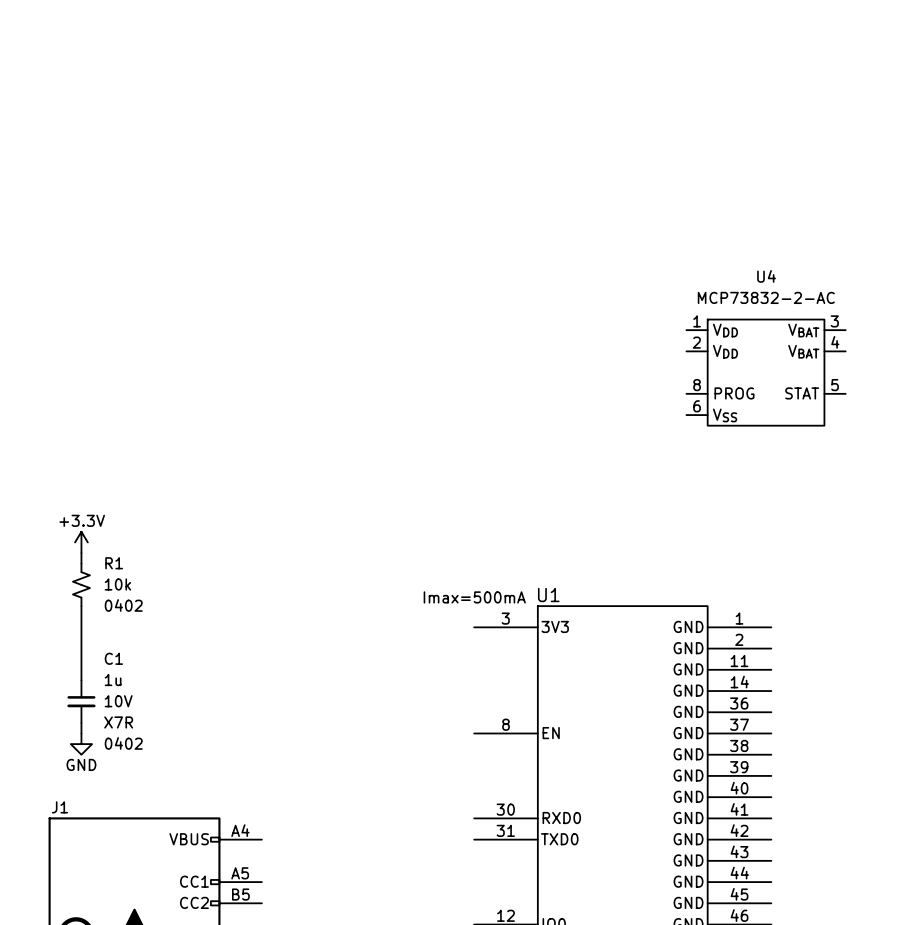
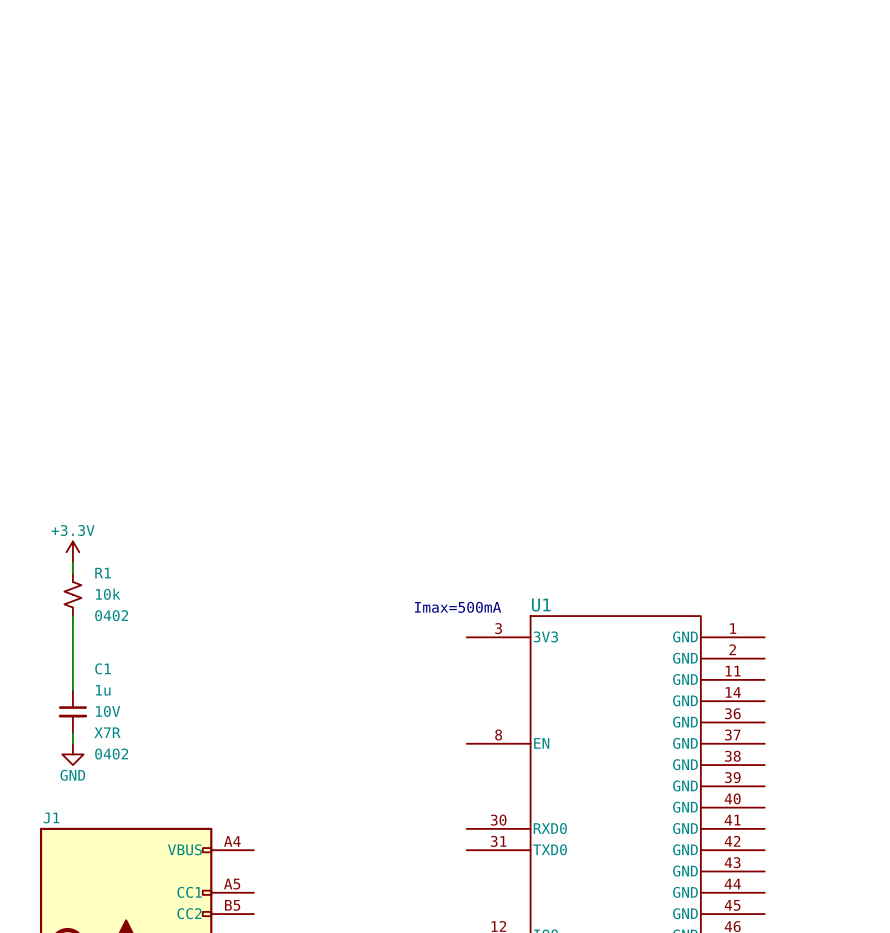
U4: MCP73832-2-AC (766, 372) -> none

